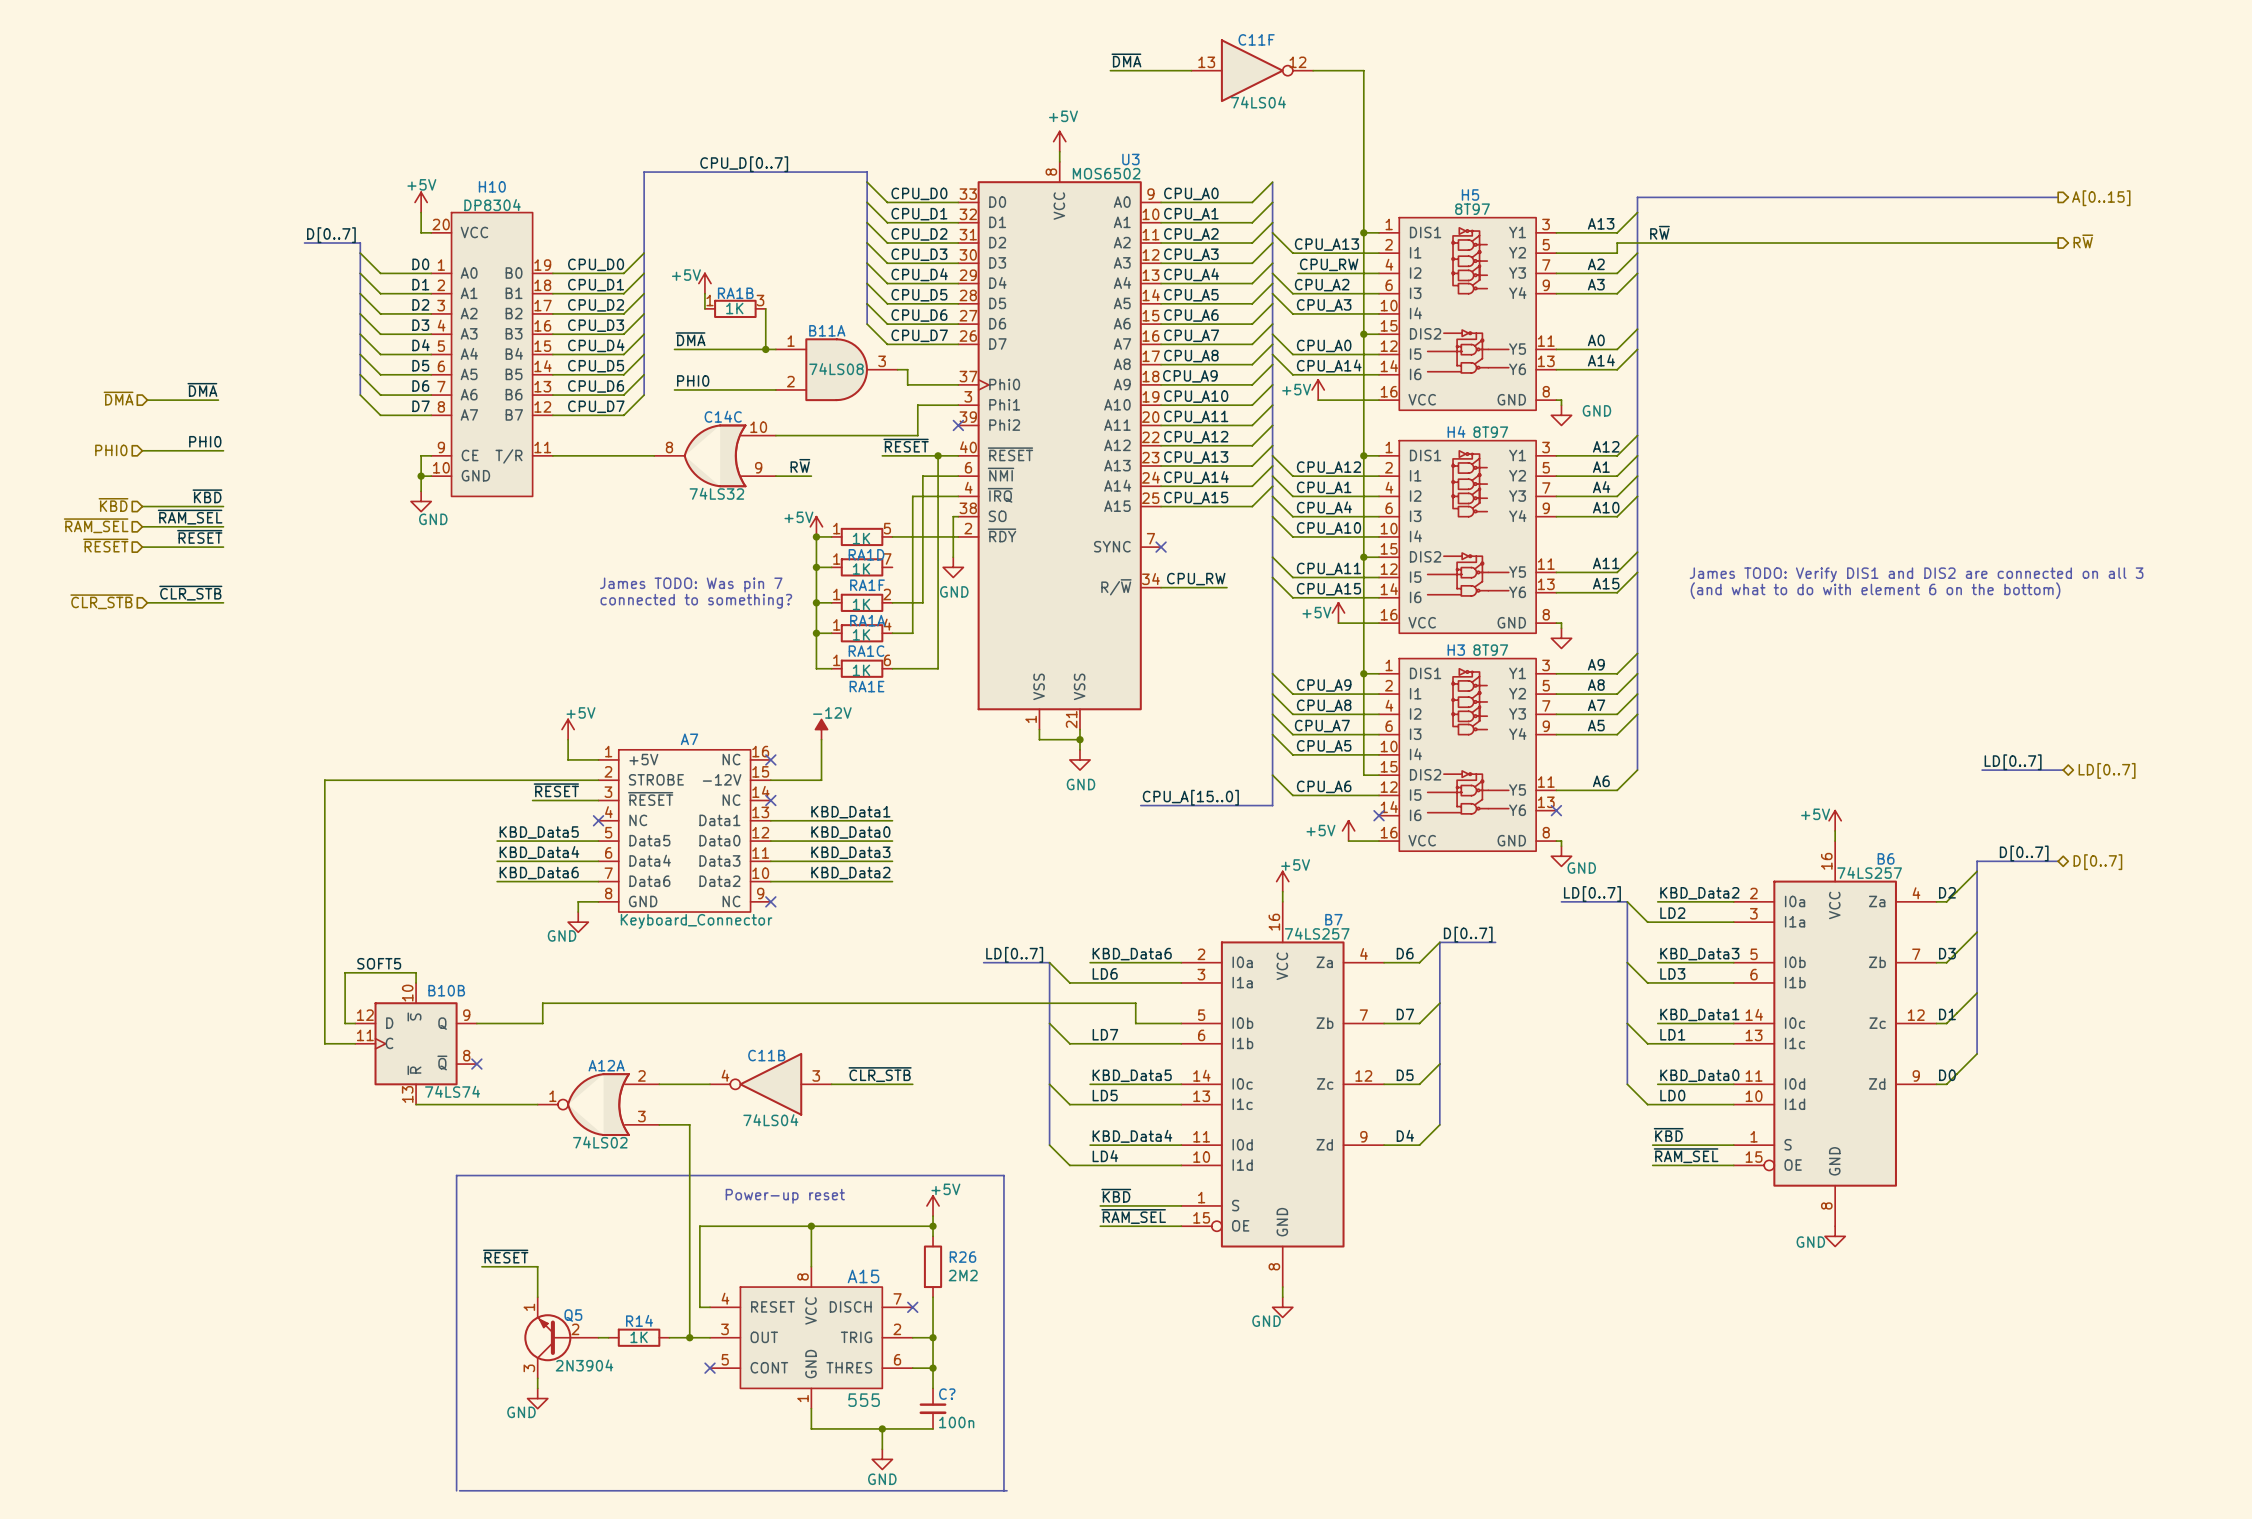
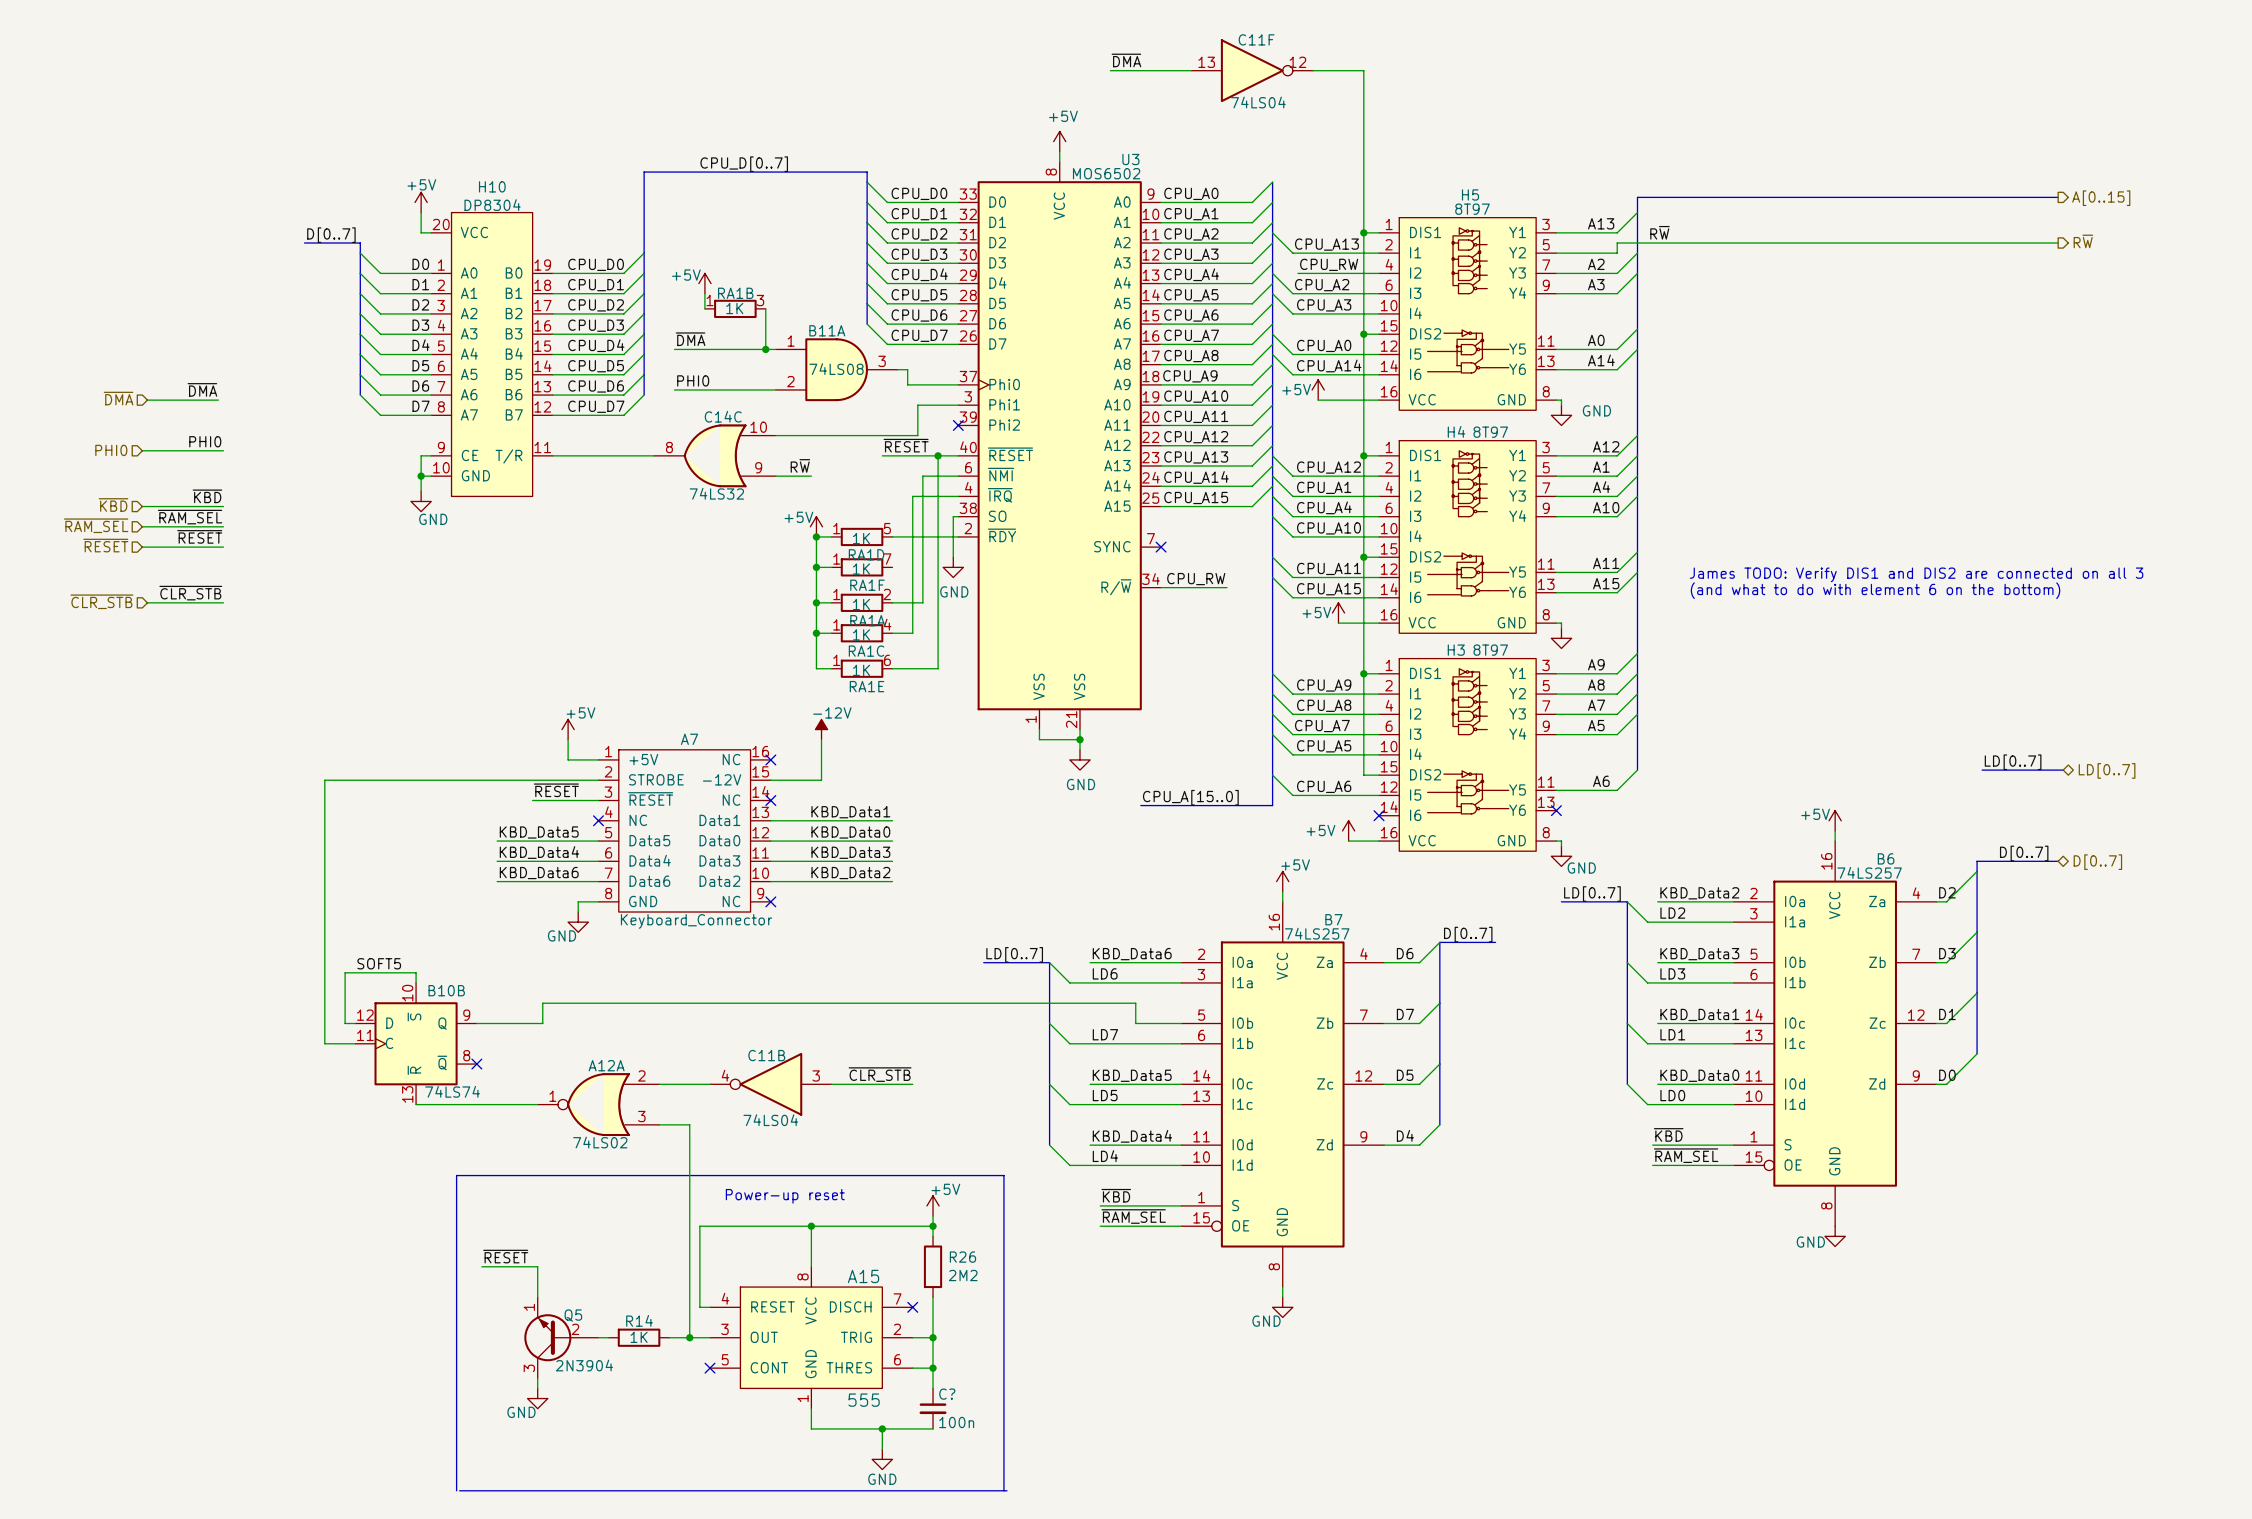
text: James TODO: Was pin 7 (691, 584) -> none
text: connected to something? (696, 601) -> none

